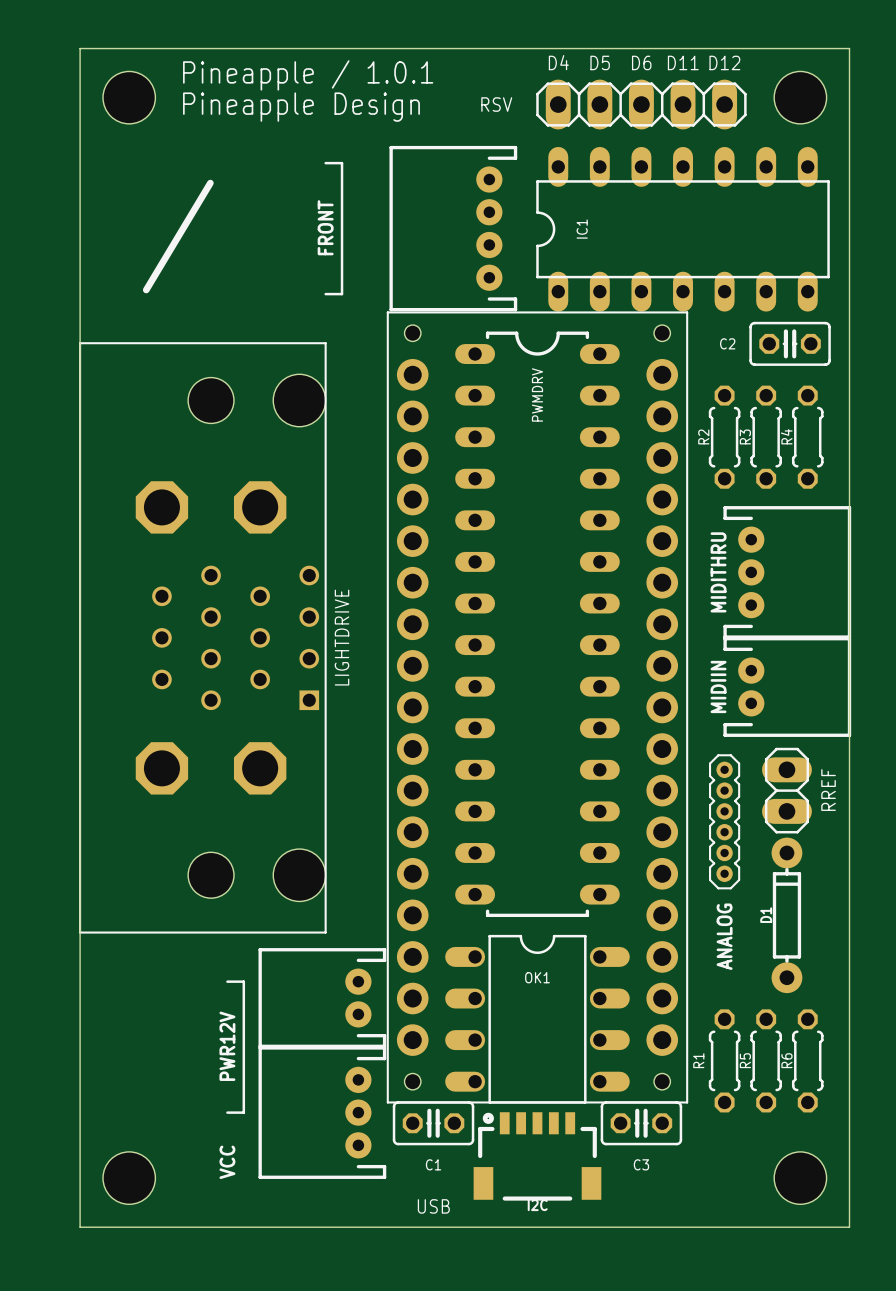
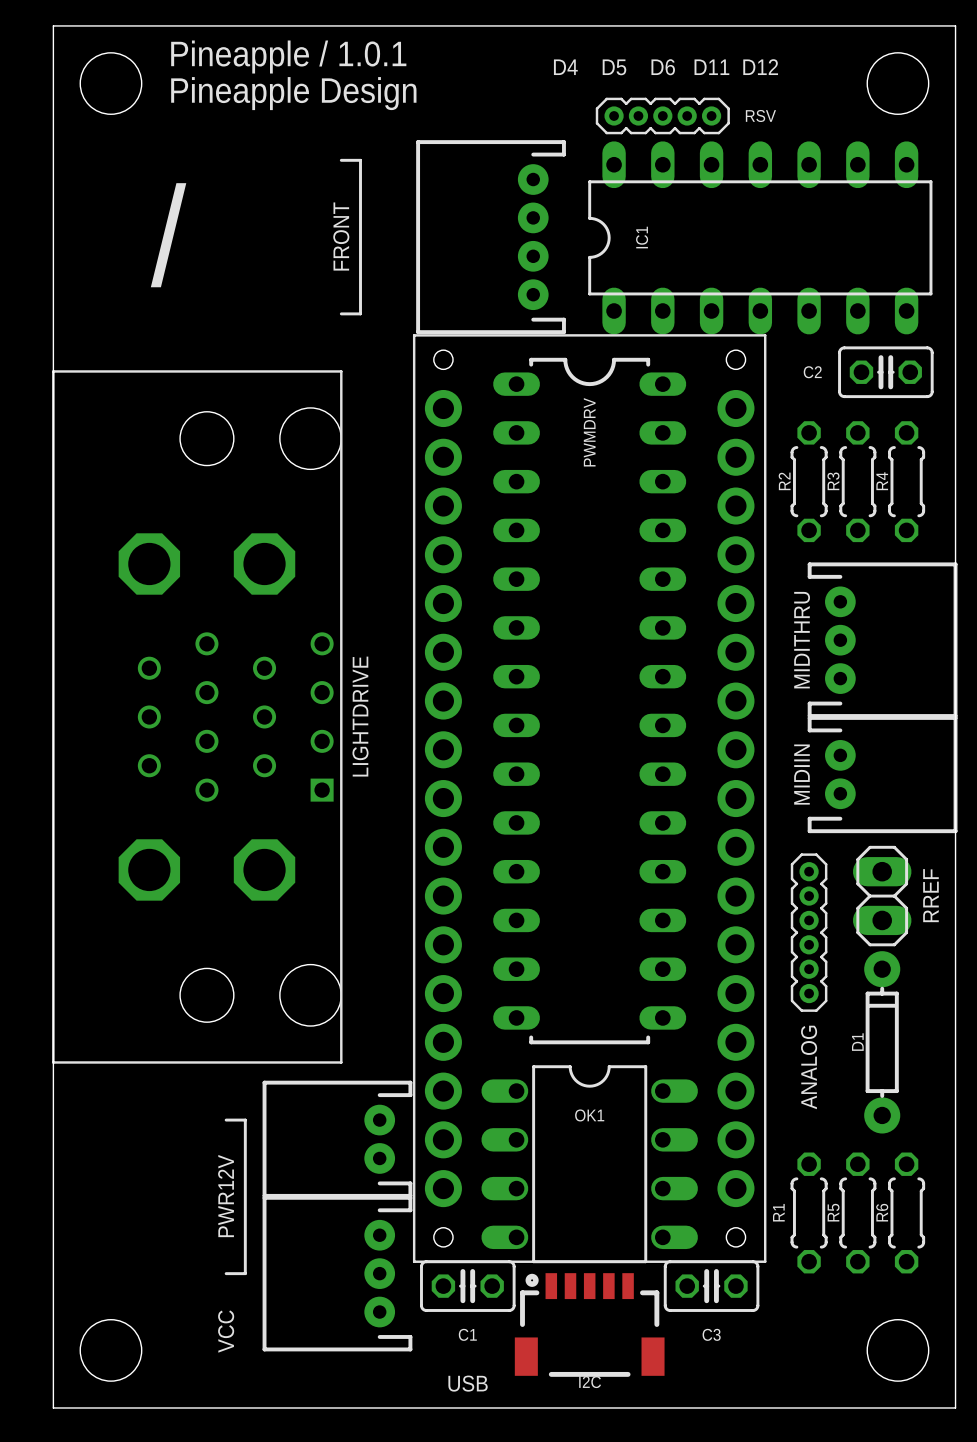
text position: D4 (558, 62) -> D4 (565, 67)
text position: D5 (600, 62) -> D5 (614, 67)
text position: D6 (641, 62) -> D6 (663, 67)
text position: D11 (683, 62) -> D11 (711, 67)
text position: D12 (724, 62) -> D12 (760, 67)
RSV: (641, 104) -> none
RSV: none -> (662, 115)

